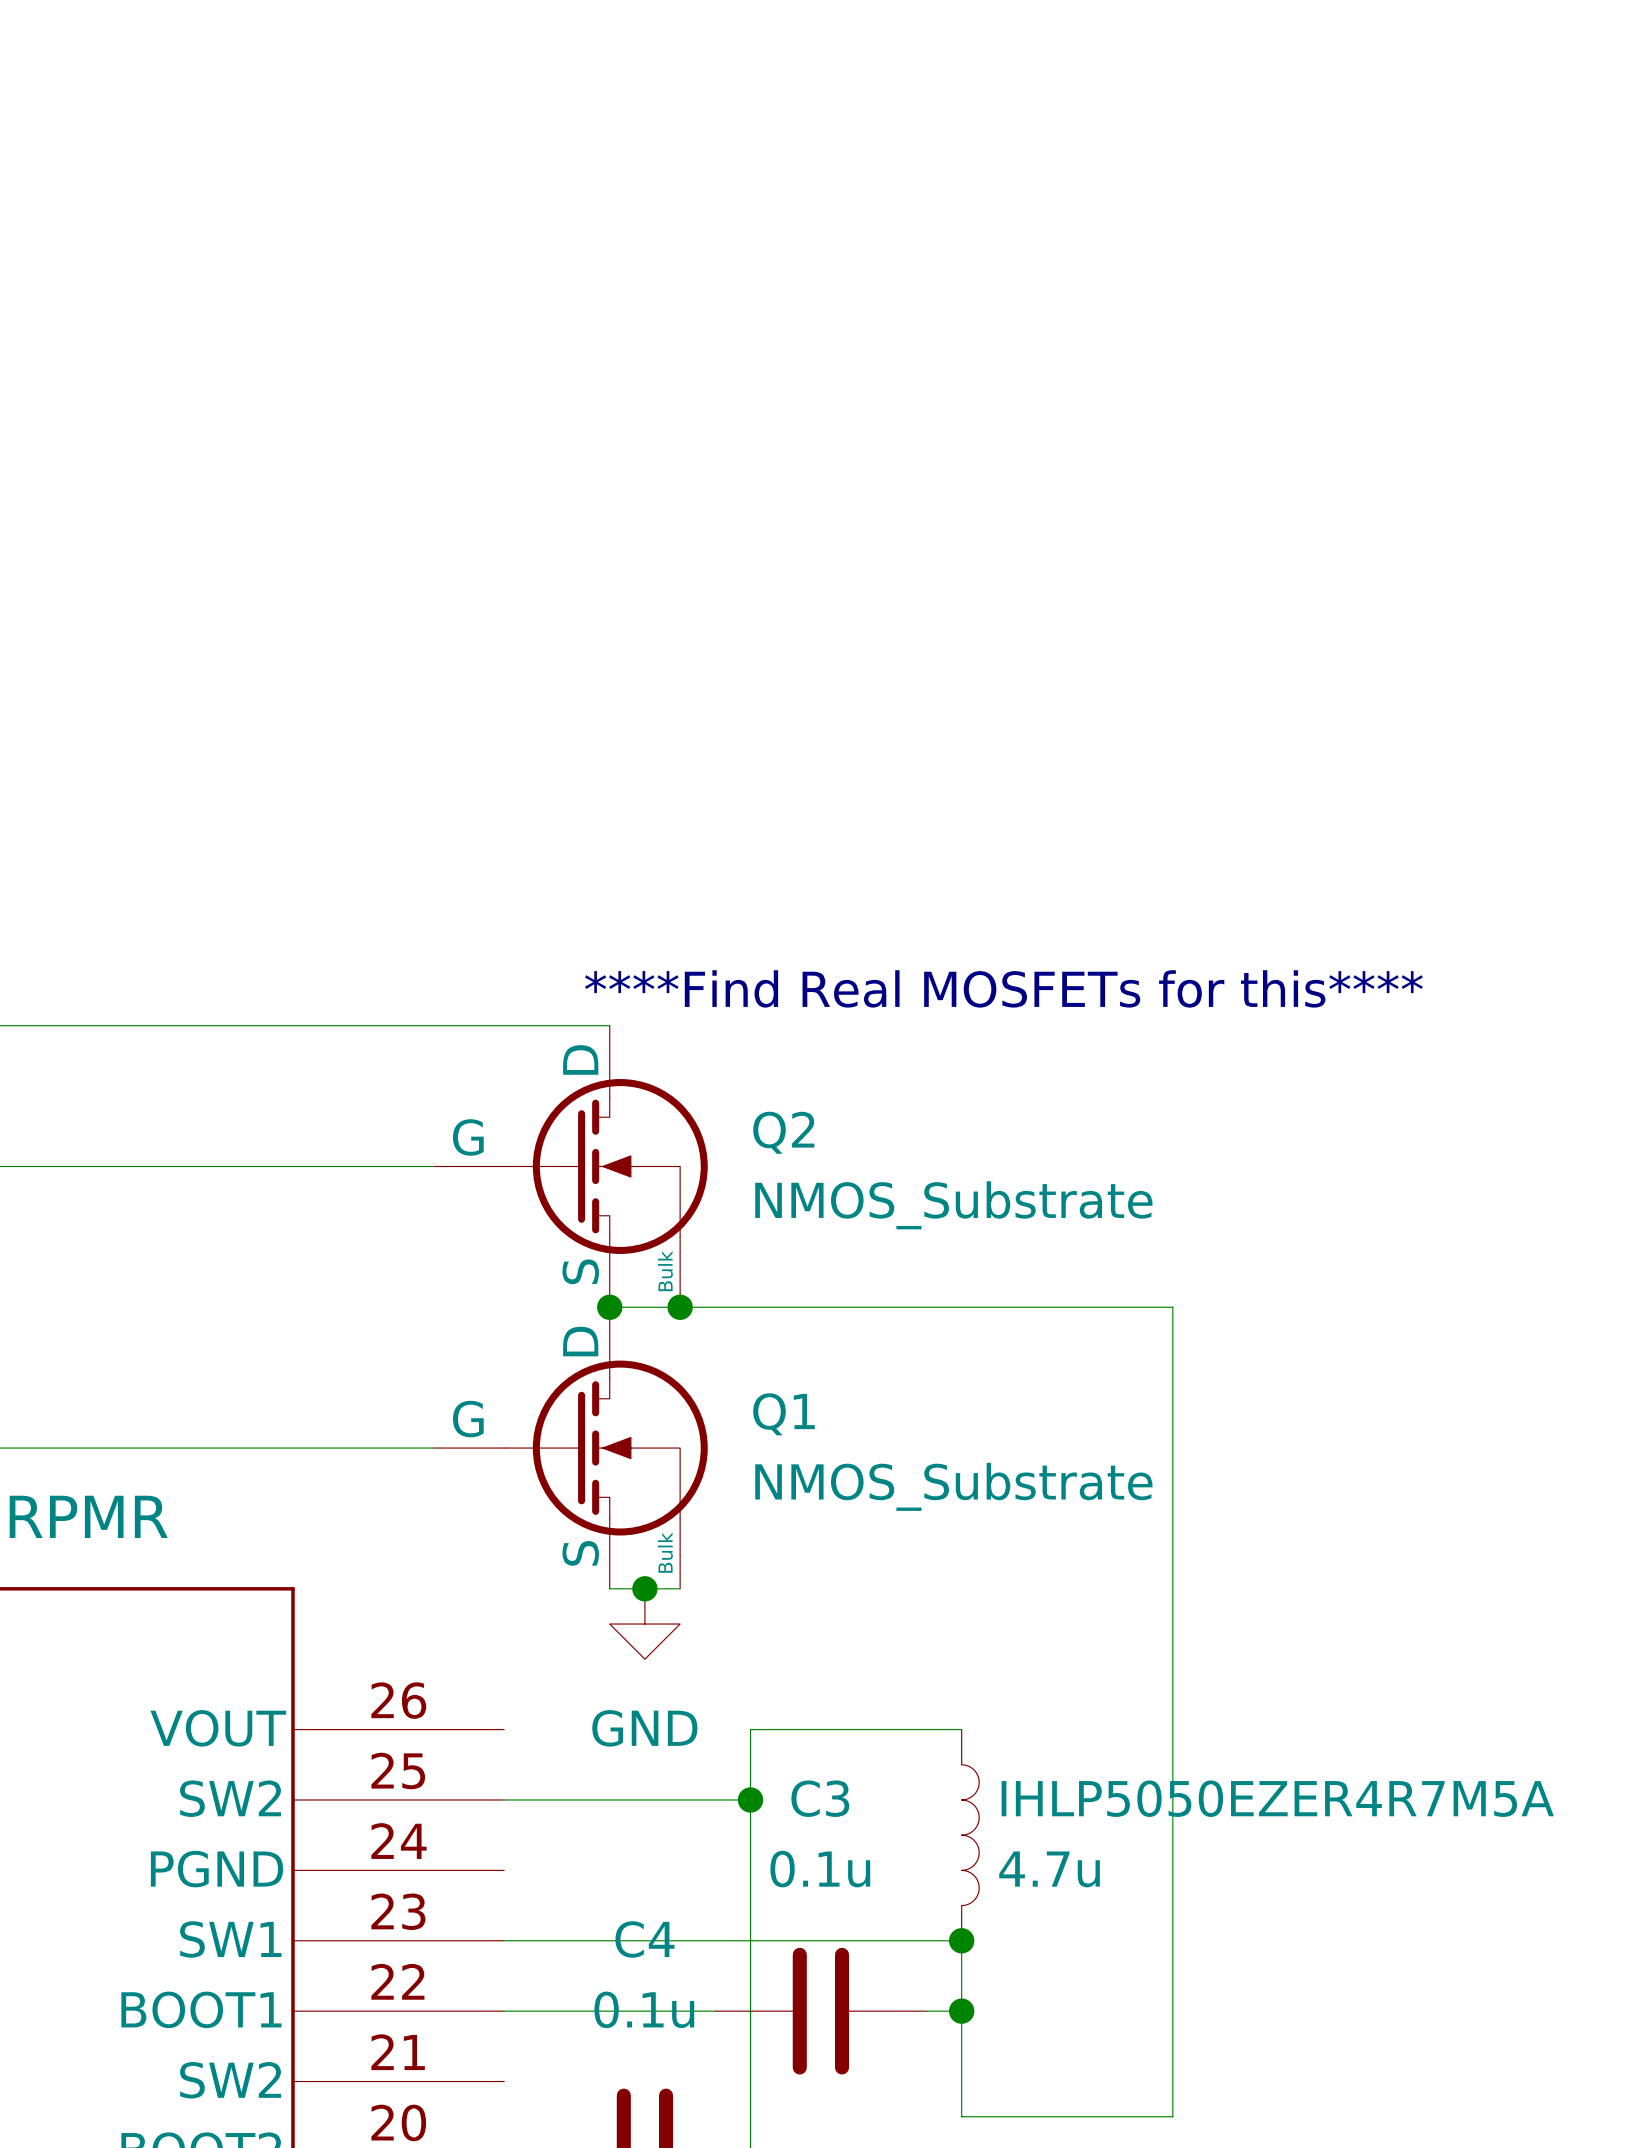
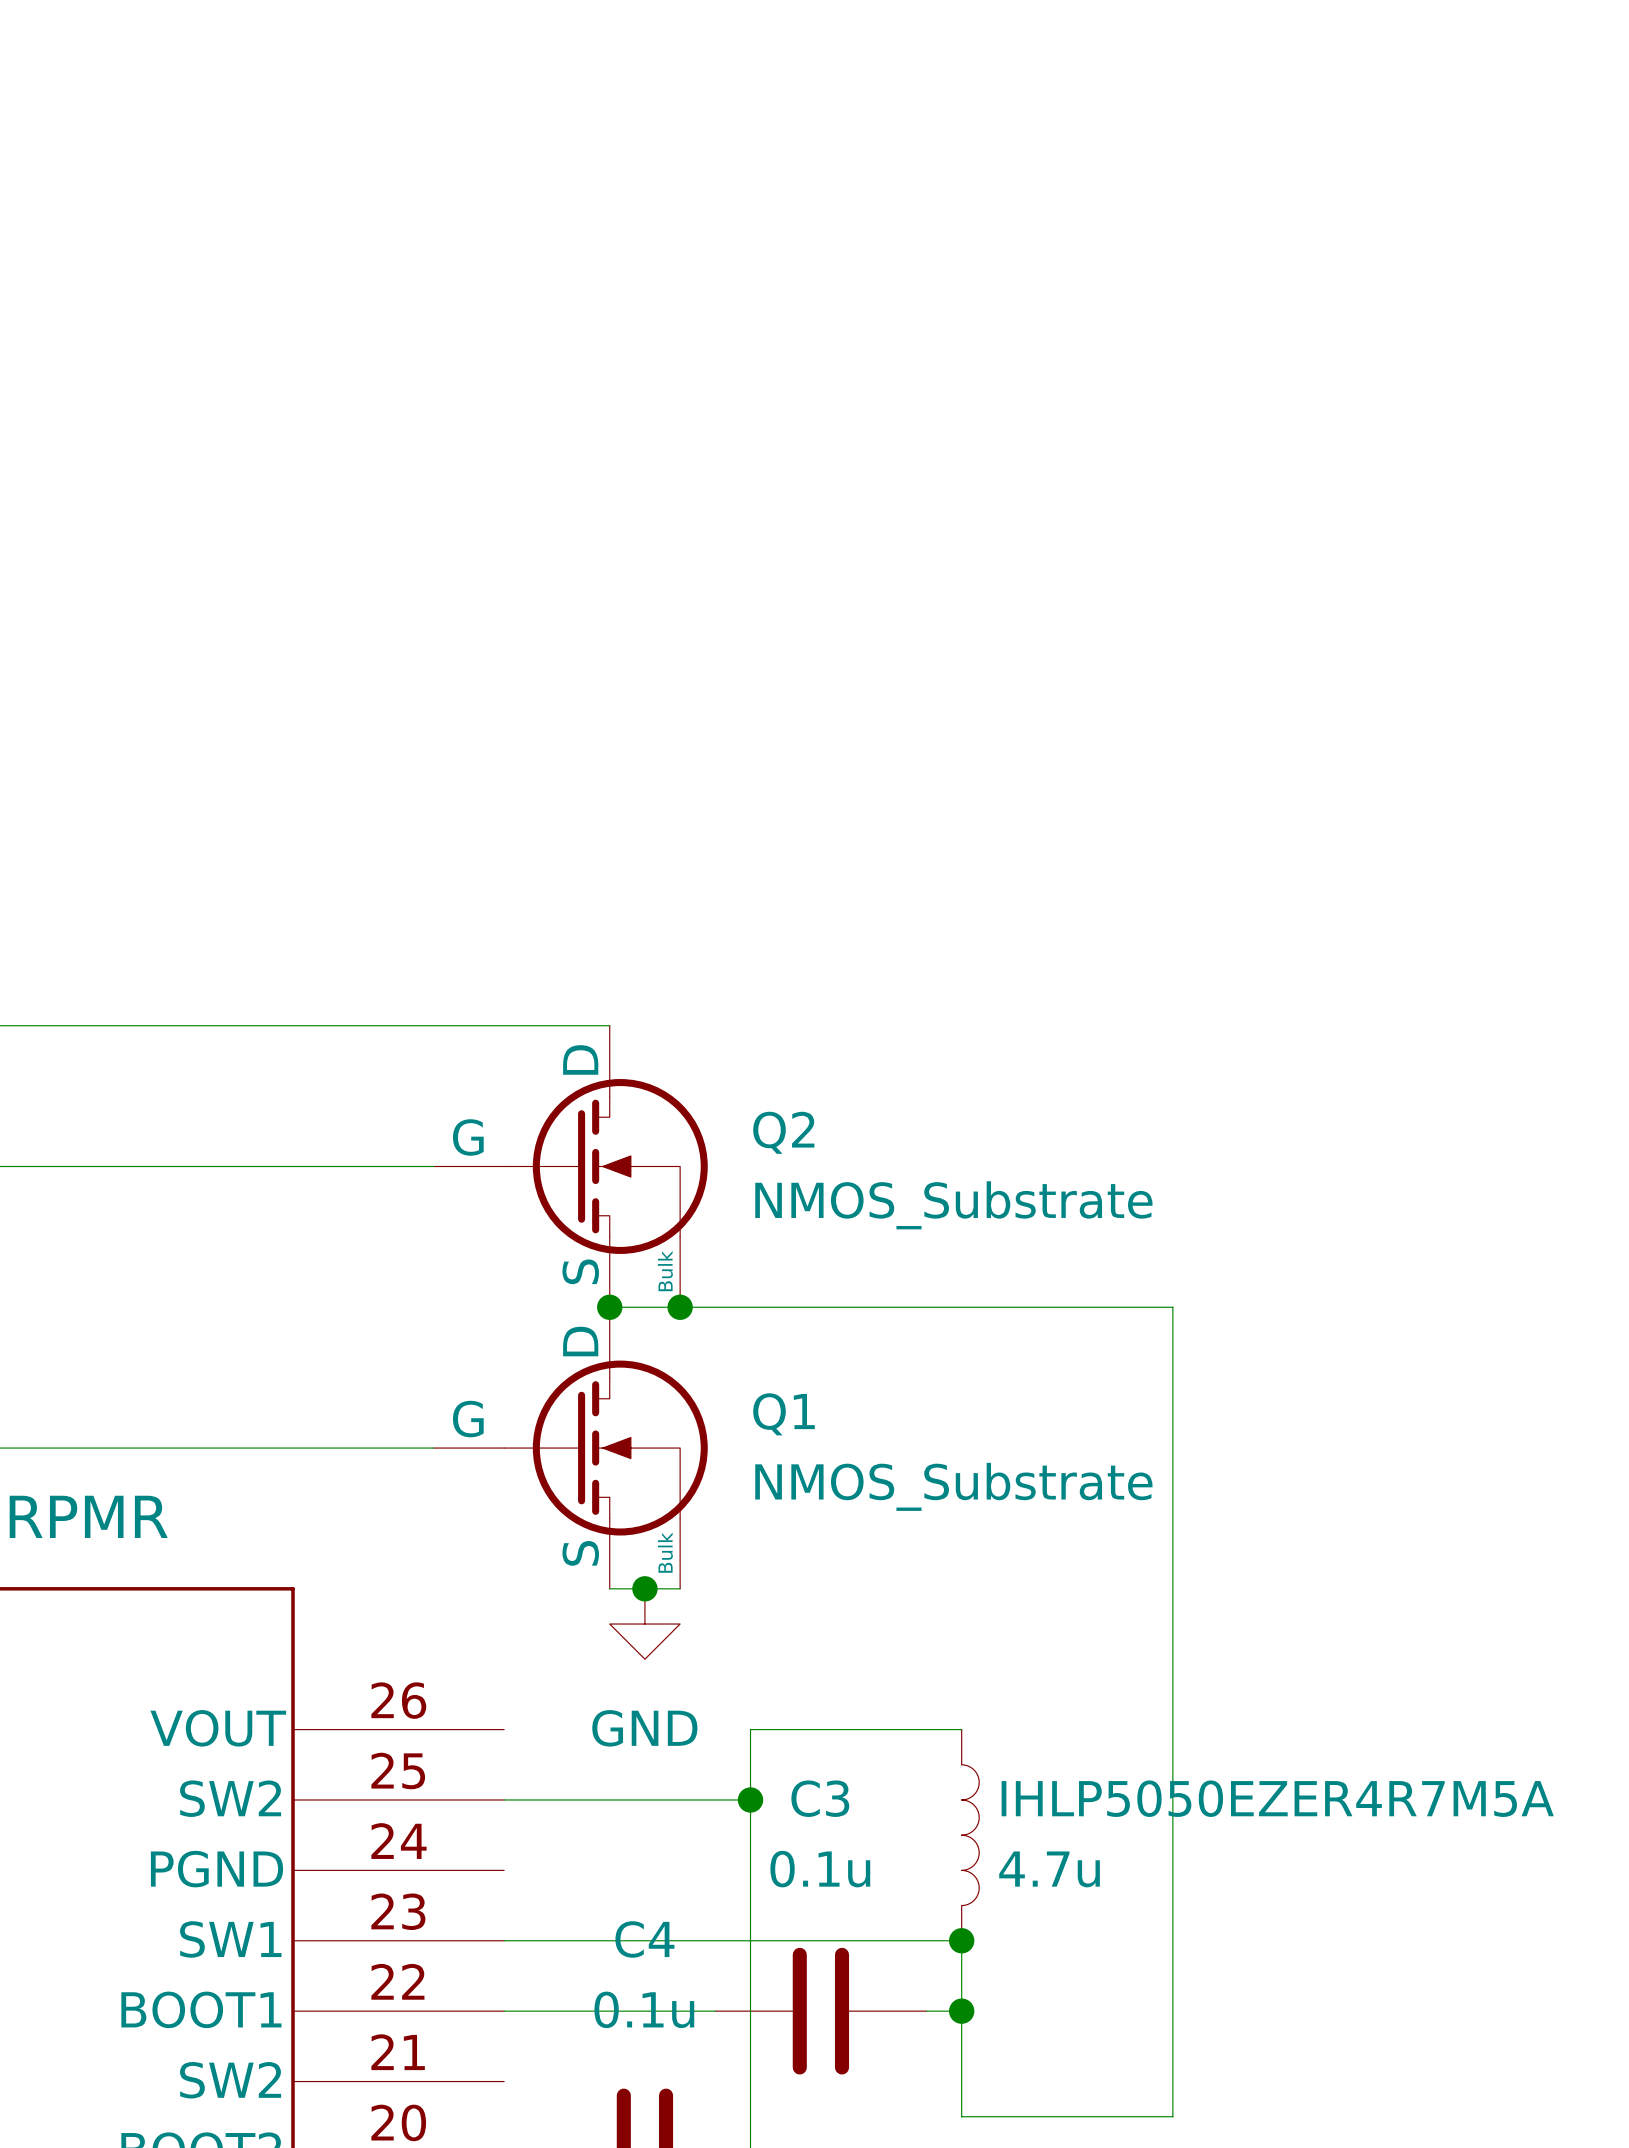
text: ****Find Real MOSFETs for this**** (1003, 988) -> none

